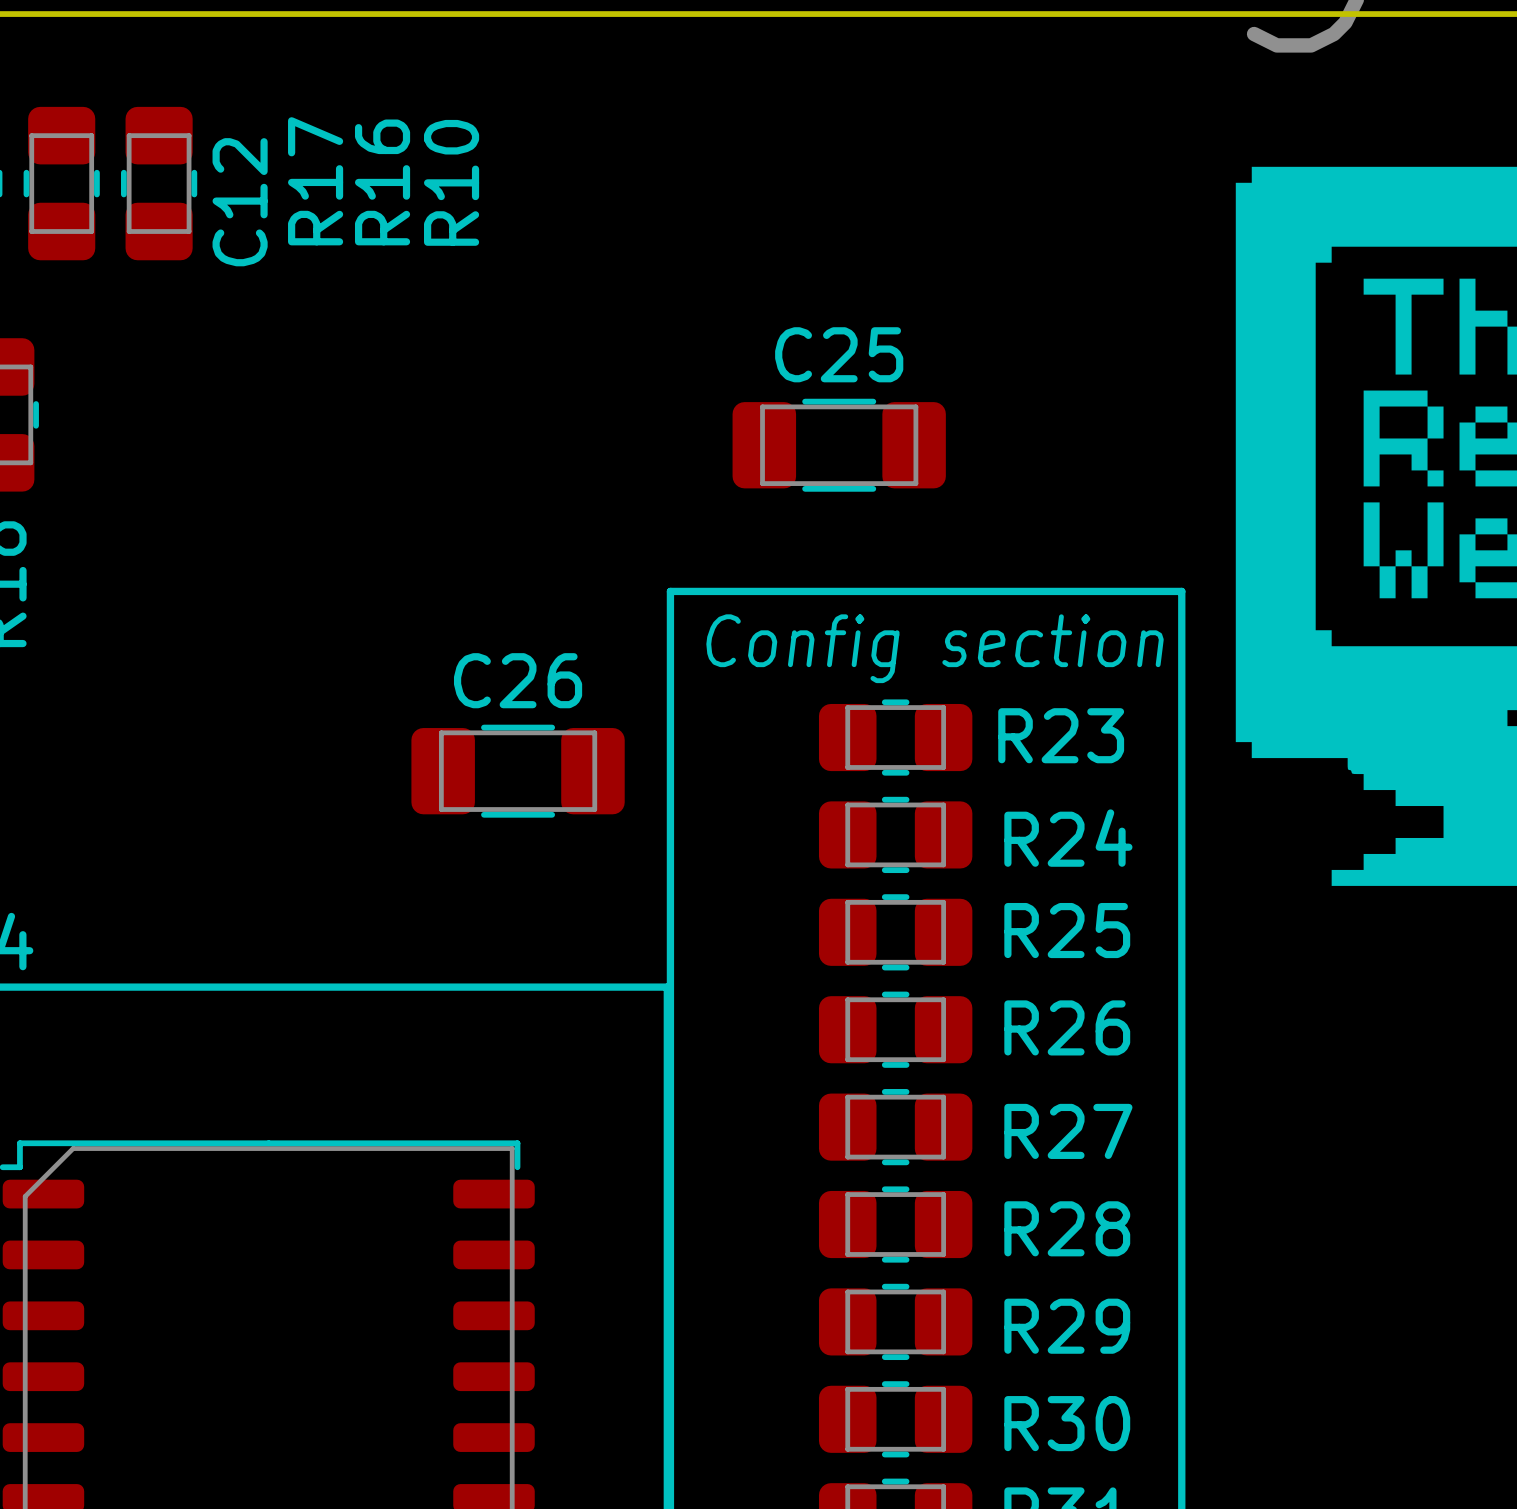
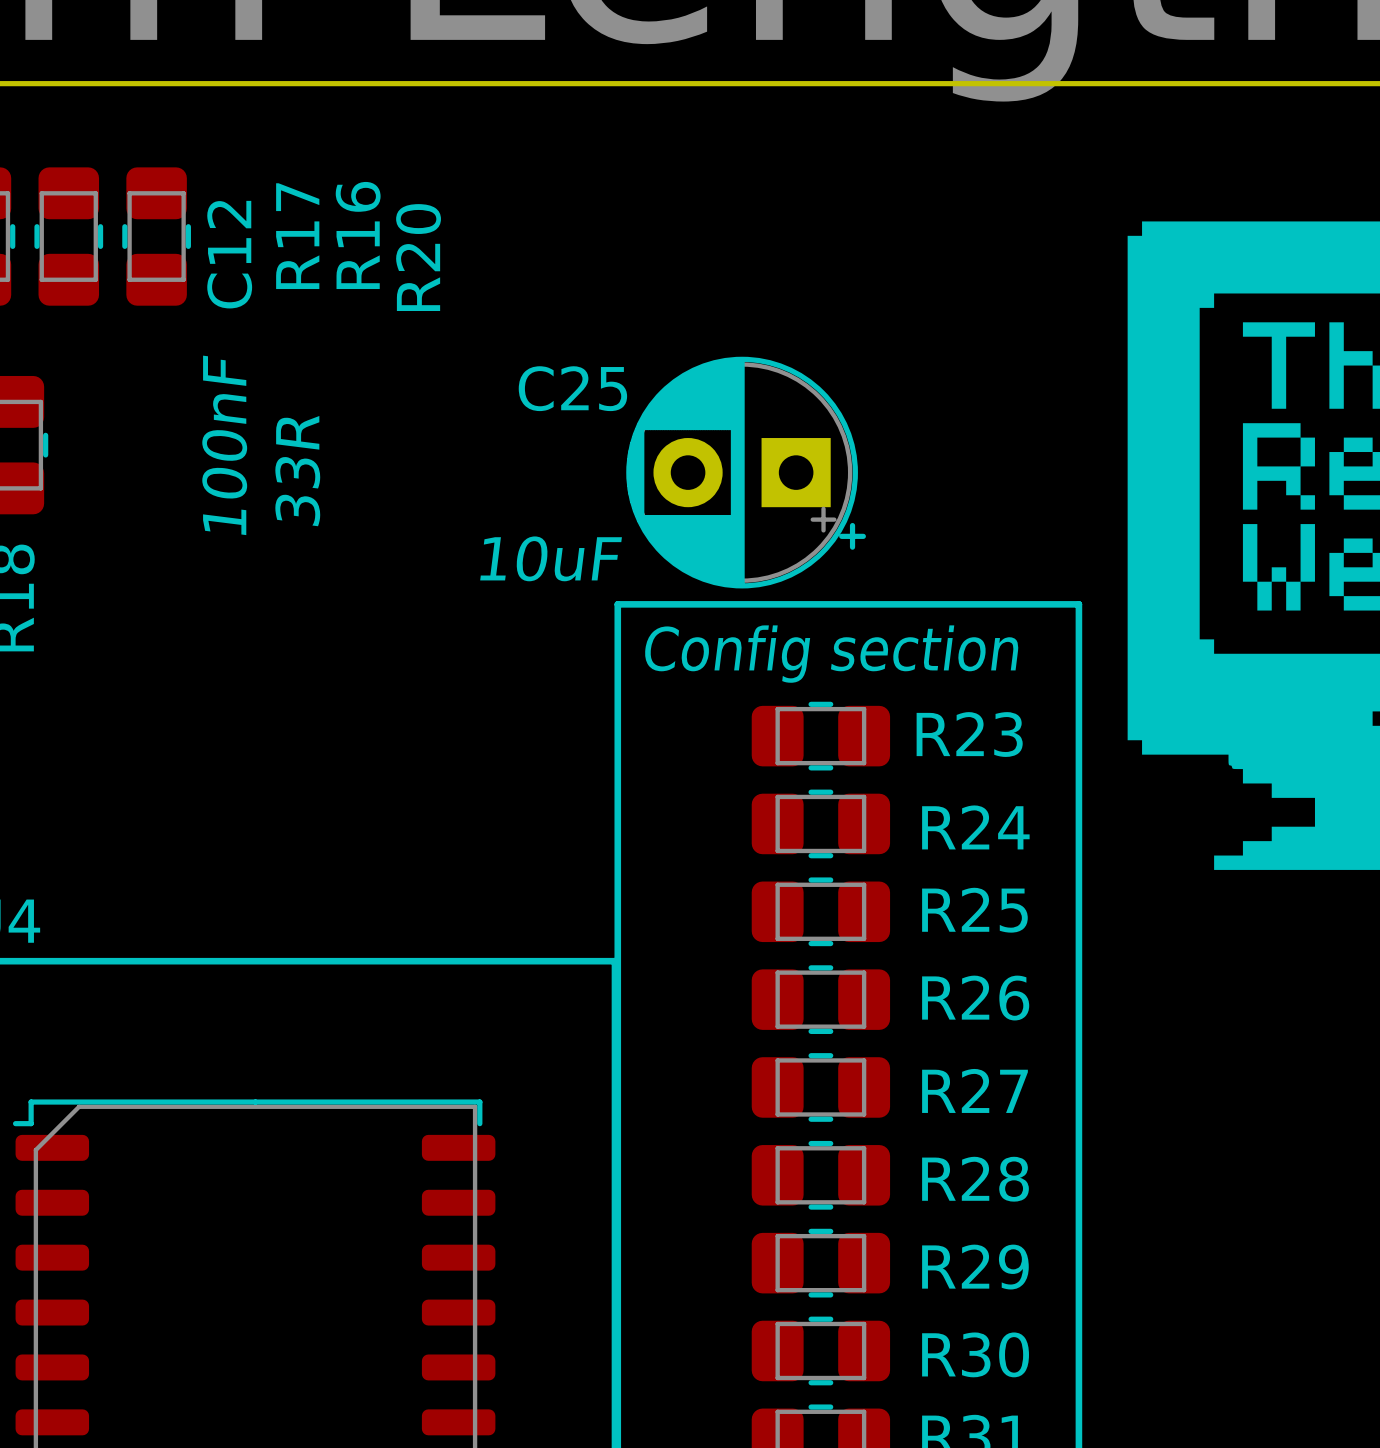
R10 name: R10 (451, 182) -> R20 (418, 257)
C25 name position: C25 (839, 354) -> C25 (572, 388)
C25 footprint: [732, 398, 946, 492] -> [626, 356, 866, 589]
C12 value: none -> 100nF (224, 445)
R16 value: none -> 33R (297, 471)
C25 value: none -> 10uF (551, 558)
C26: (518, 771) -> none

